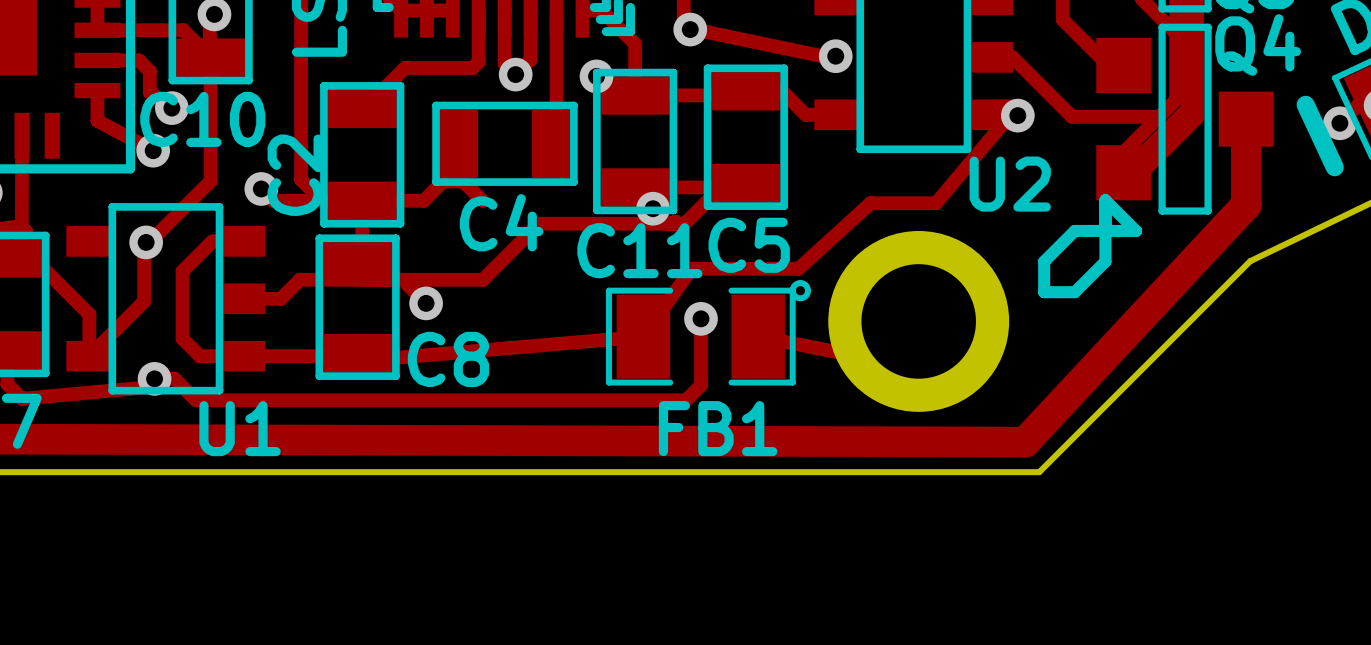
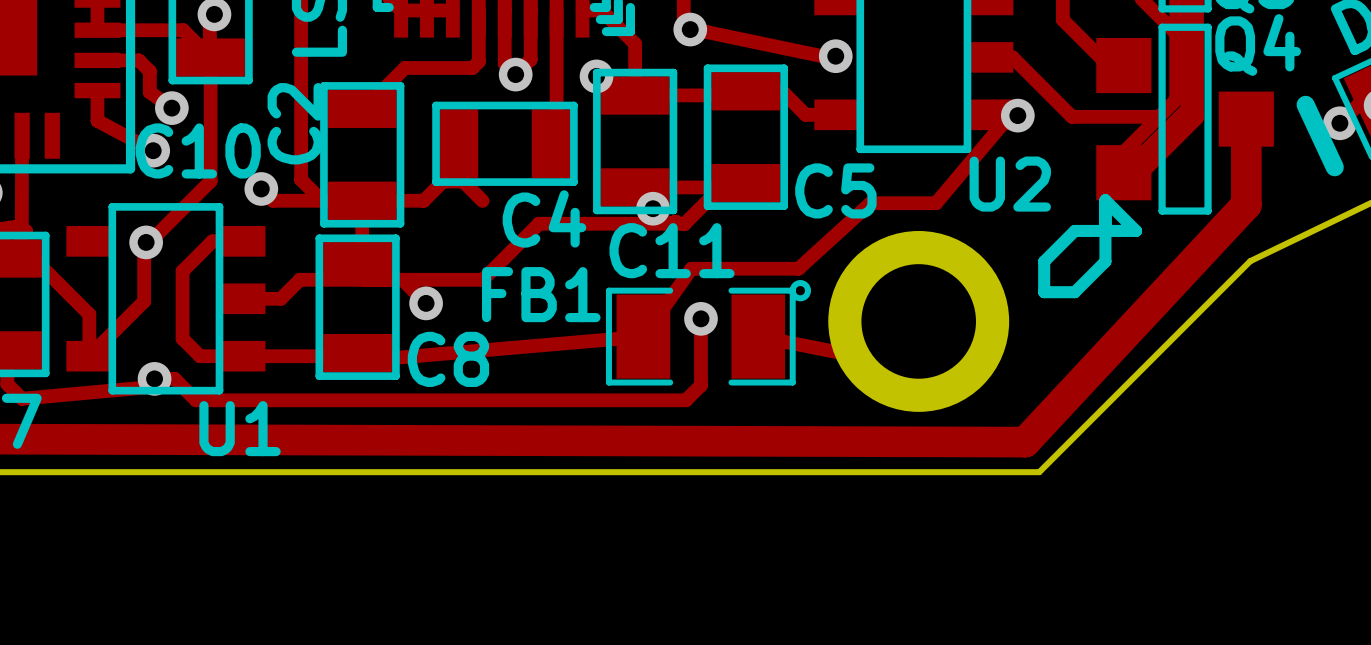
C10 name position: C10 (202, 119) -> C10 (198, 150)
C2 name position: C2 (295, 175) -> C2 (295, 123)
C4 name position: C4 (501, 222) -> C4 (544, 218)
C5 name position: C5 (749, 245) -> C5 (835, 190)
C11 name position: C11 (639, 250) -> C11 (672, 250)
FB1 name position: FB1 (718, 428) -> FB1 (541, 294)

